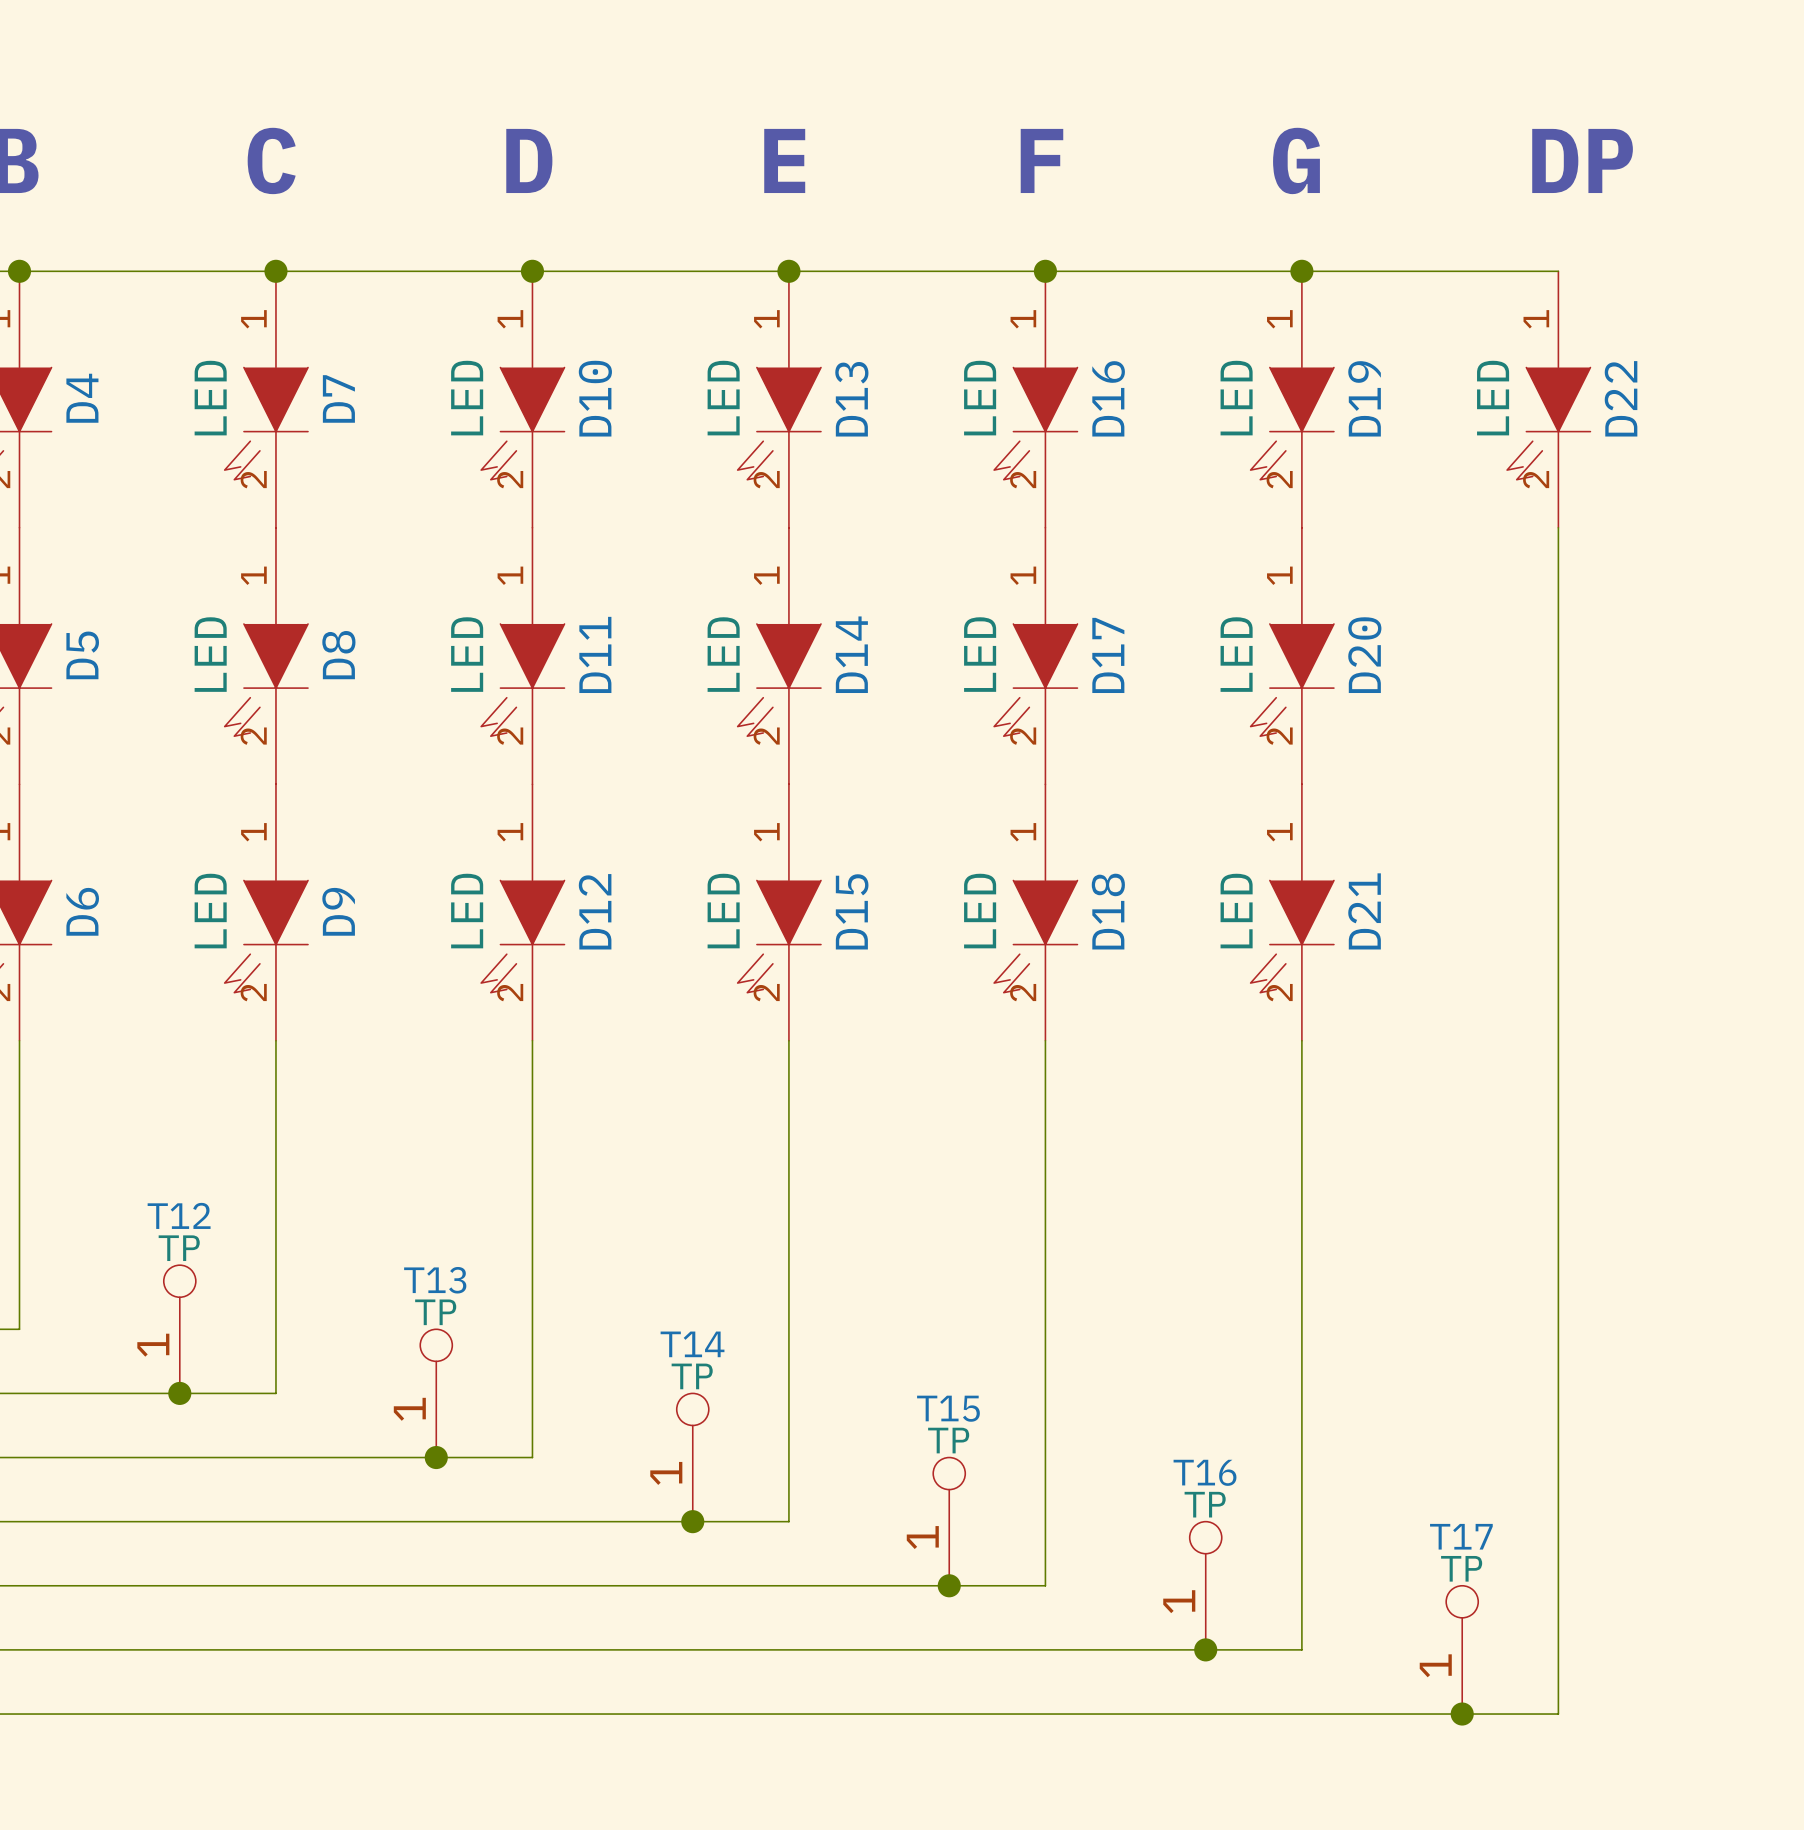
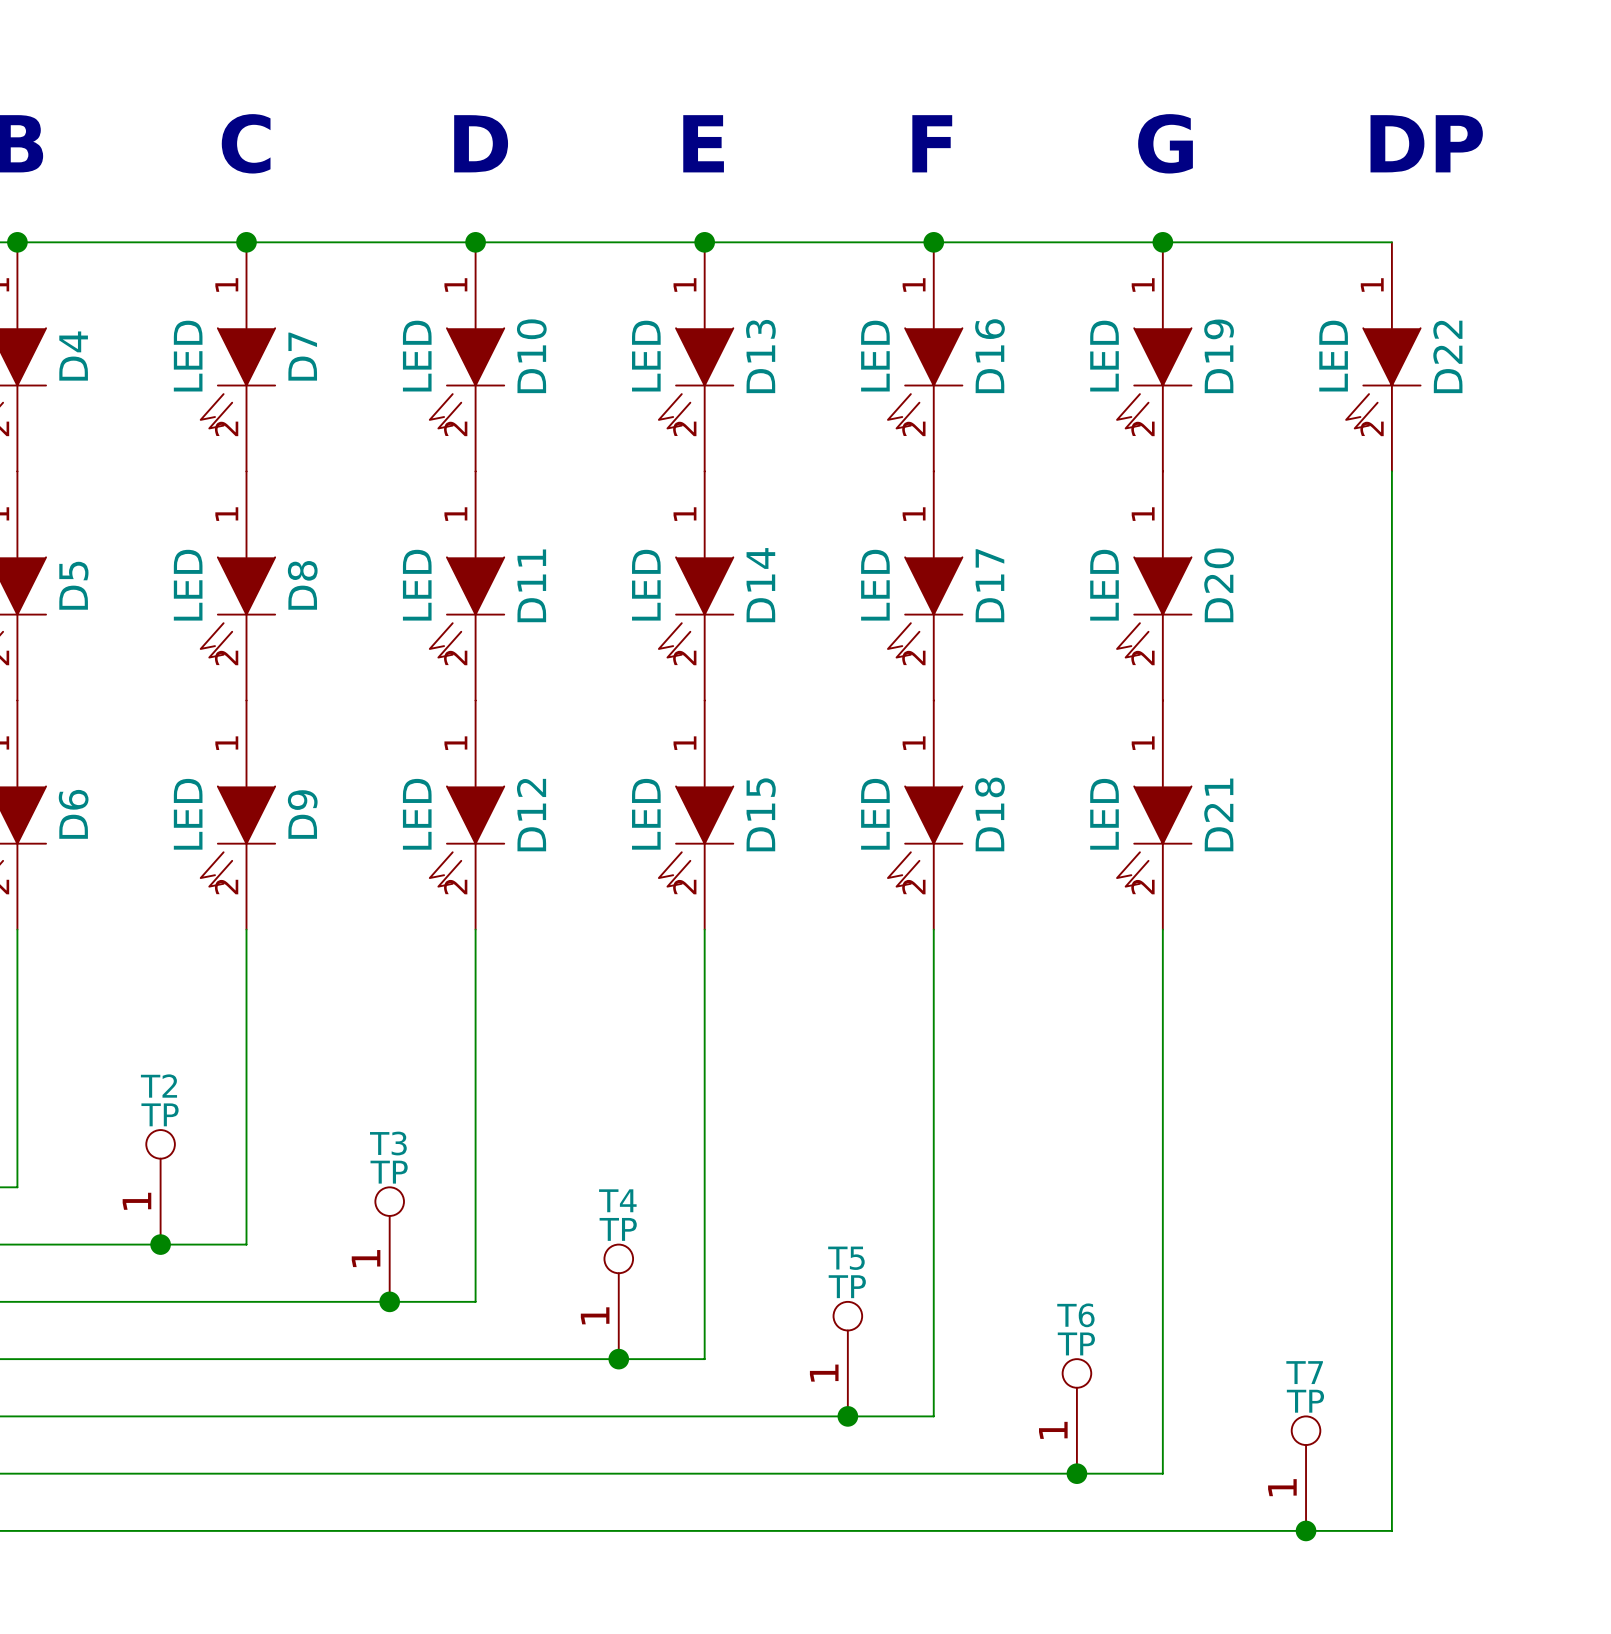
T12 name: T12 (179, 1215) -> T2 (158, 1086)
T13 name: T13 (435, 1280) -> T3 (388, 1143)
T14 name: T14 (692, 1344) -> T4 (617, 1200)
T15 name: T15 (948, 1408) -> T5 (846, 1258)
T16 name: T16 (1205, 1472) -> T6 (1075, 1315)
T17 name: T17 (1461, 1536) -> T7 (1304, 1372)

